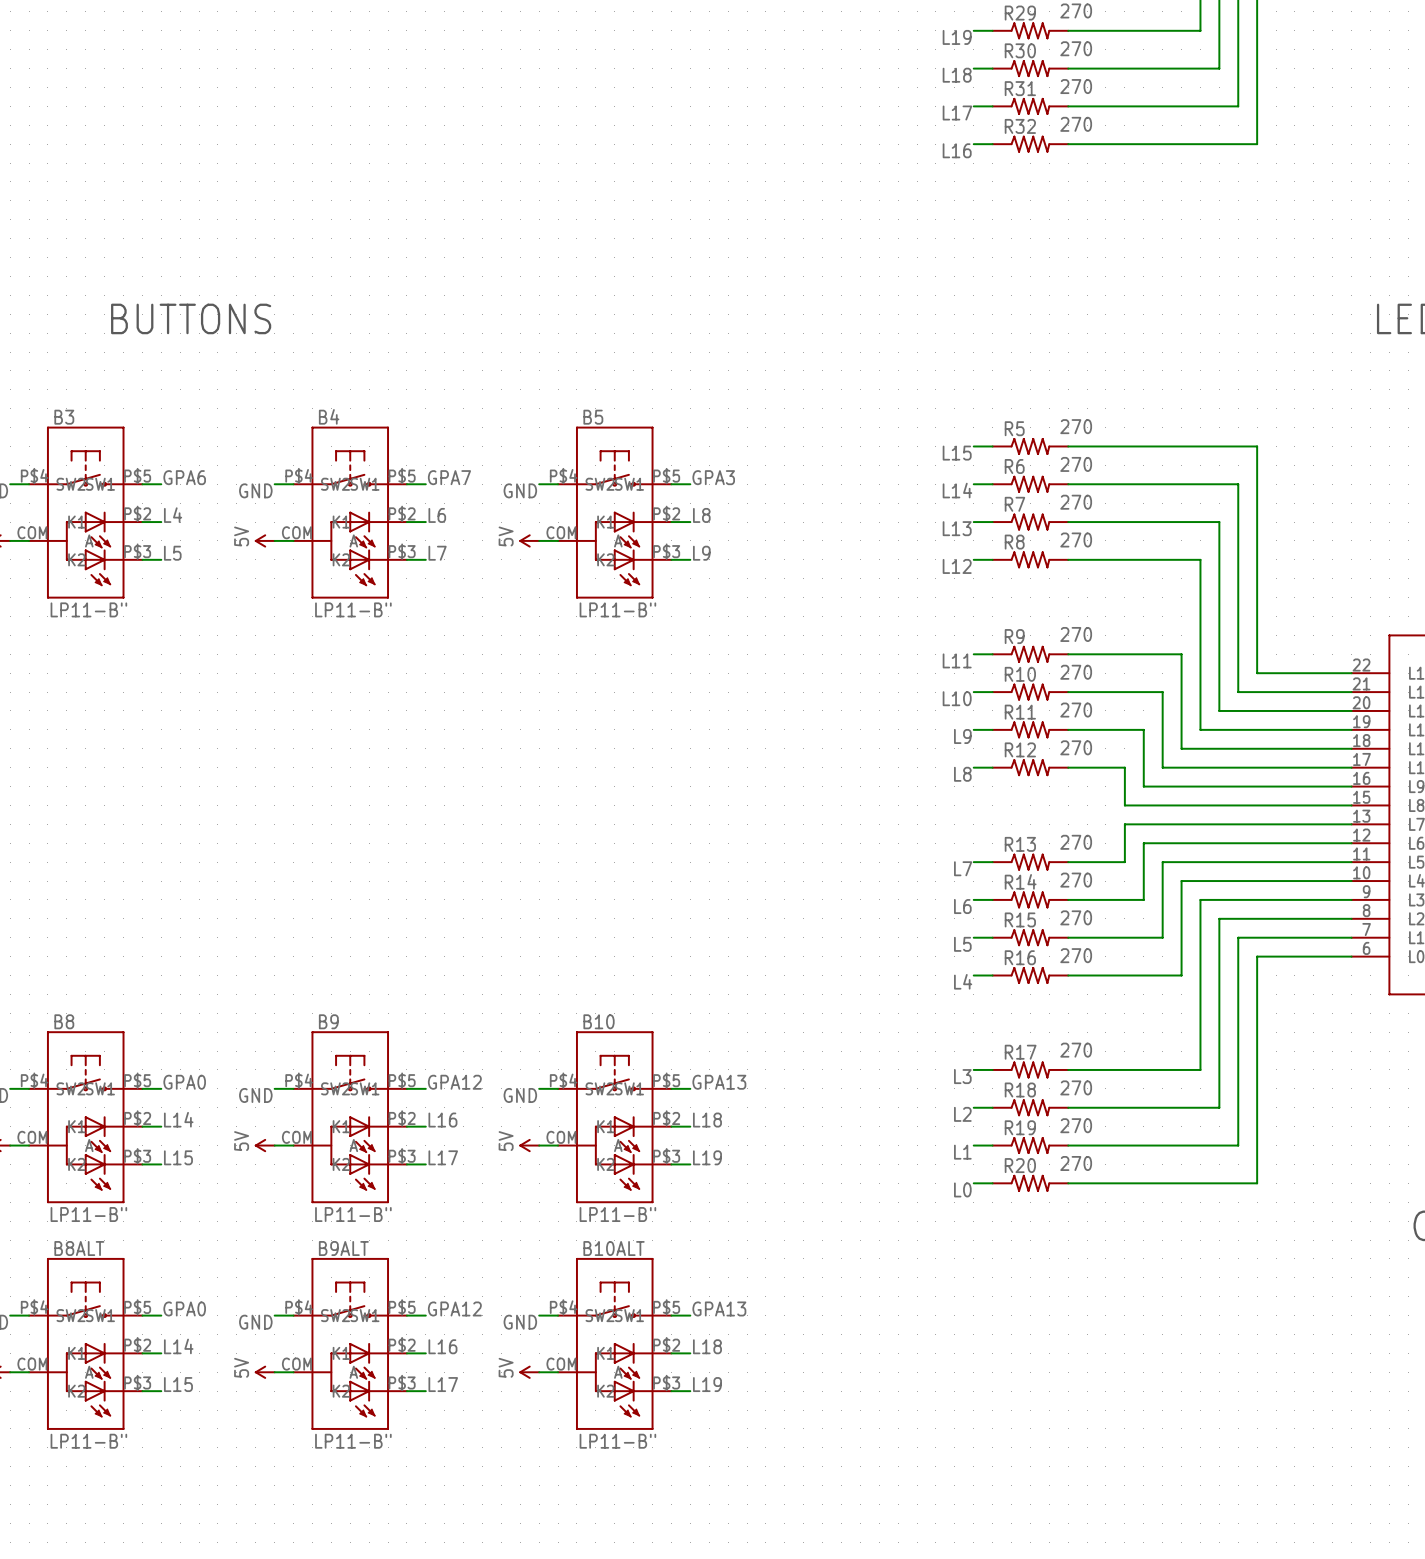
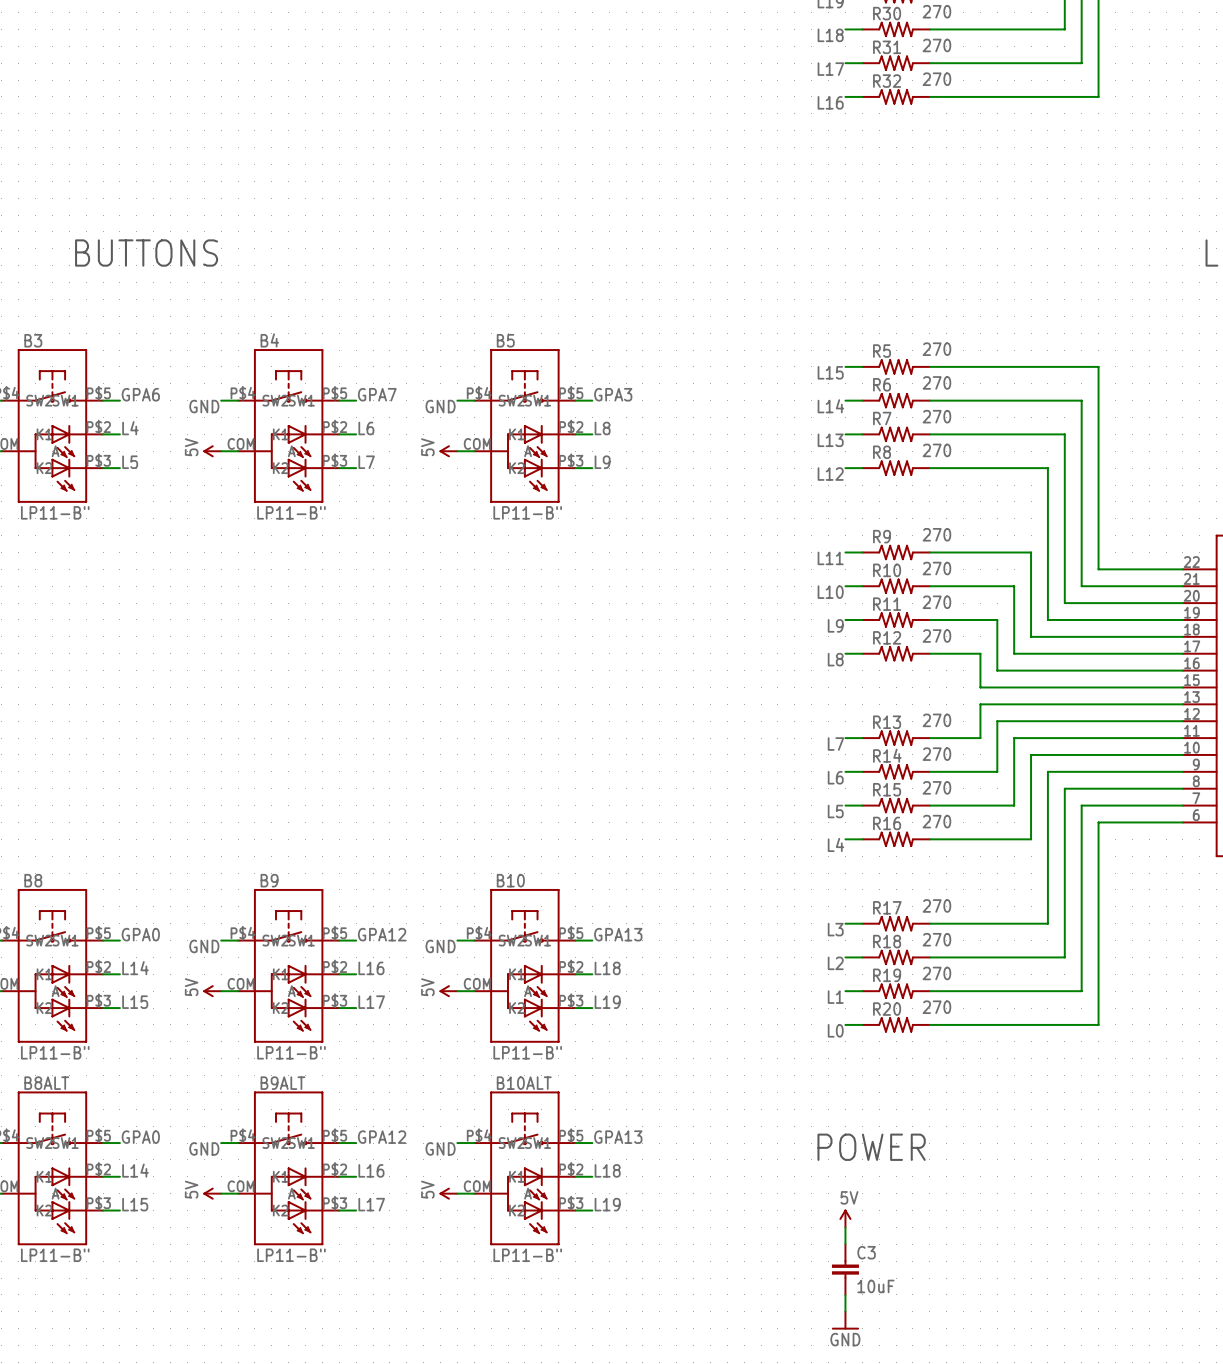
text: none -> POWER (871, 1147)
power symbol: none -> 5V (845, 1218)
wire: none -> (845, 1227) (845, 1244)
C3: none -> 10uF (845, 1269)
wire: none -> (845, 1294) (845, 1311)
power symbol: none -> GND (845, 1320)

